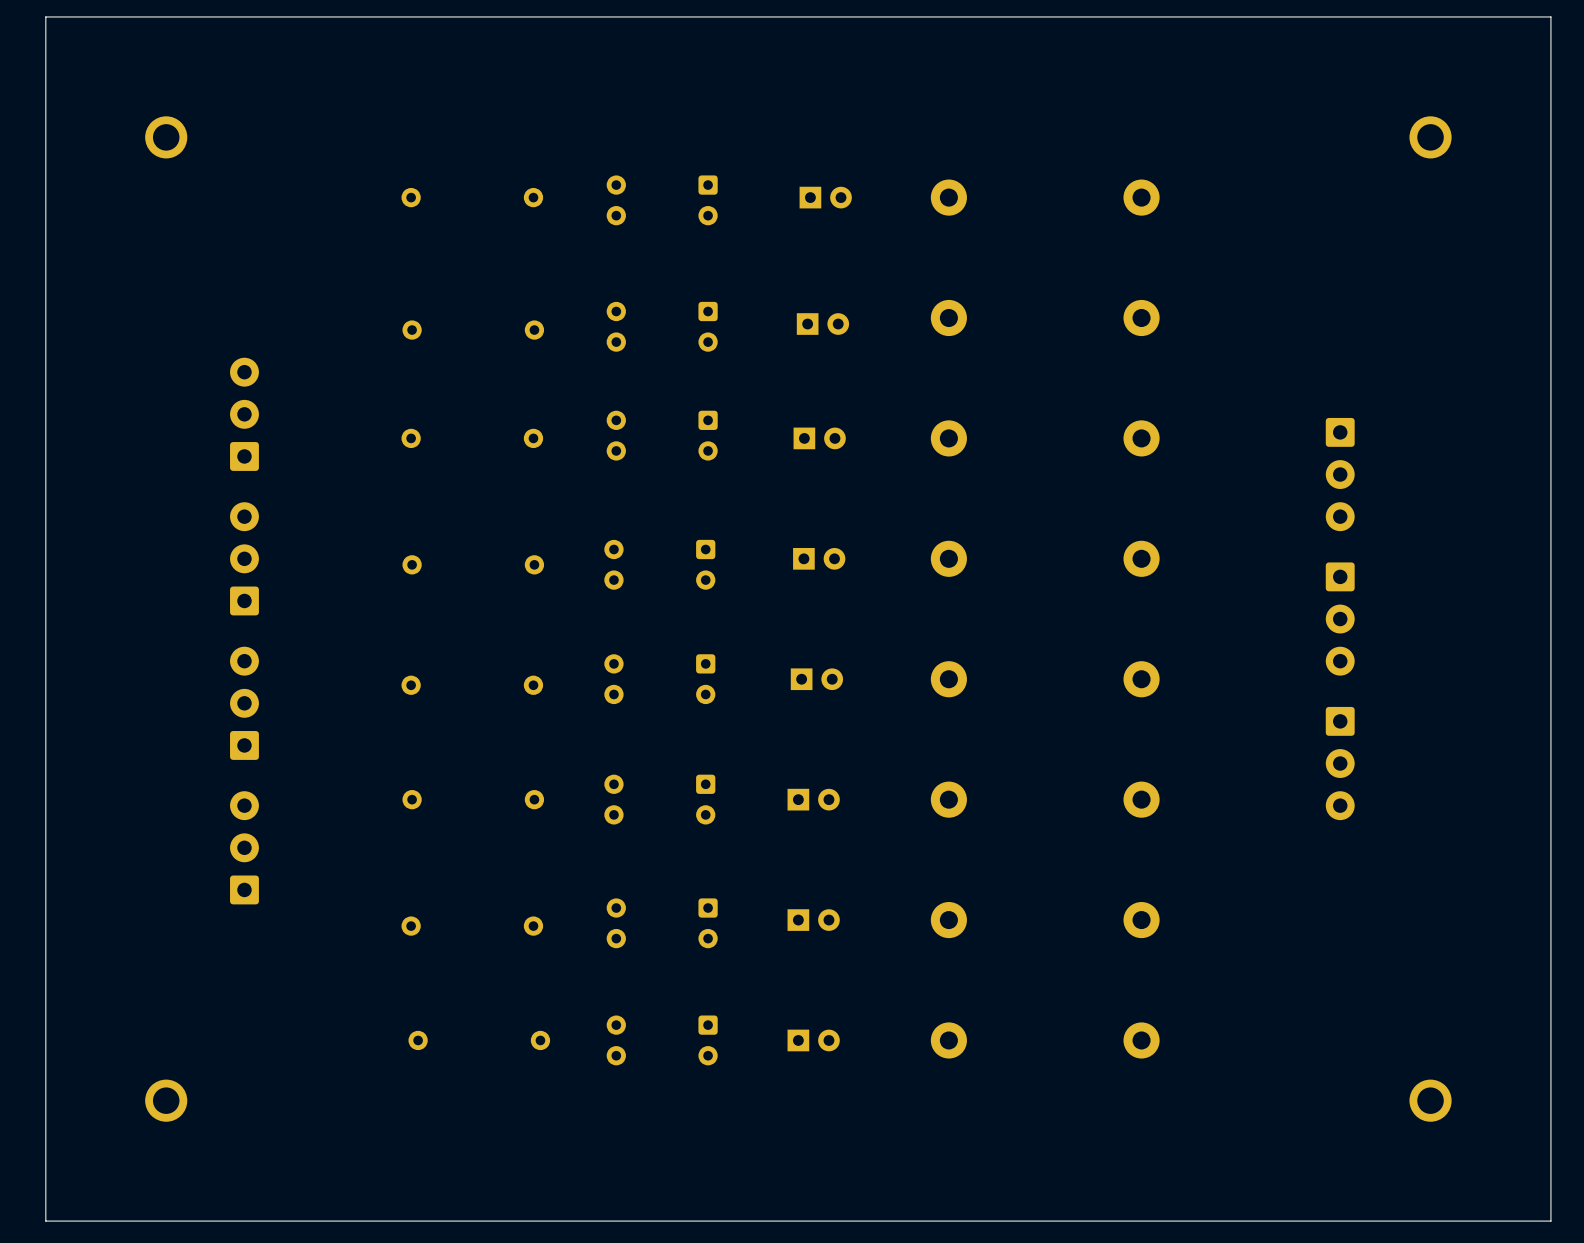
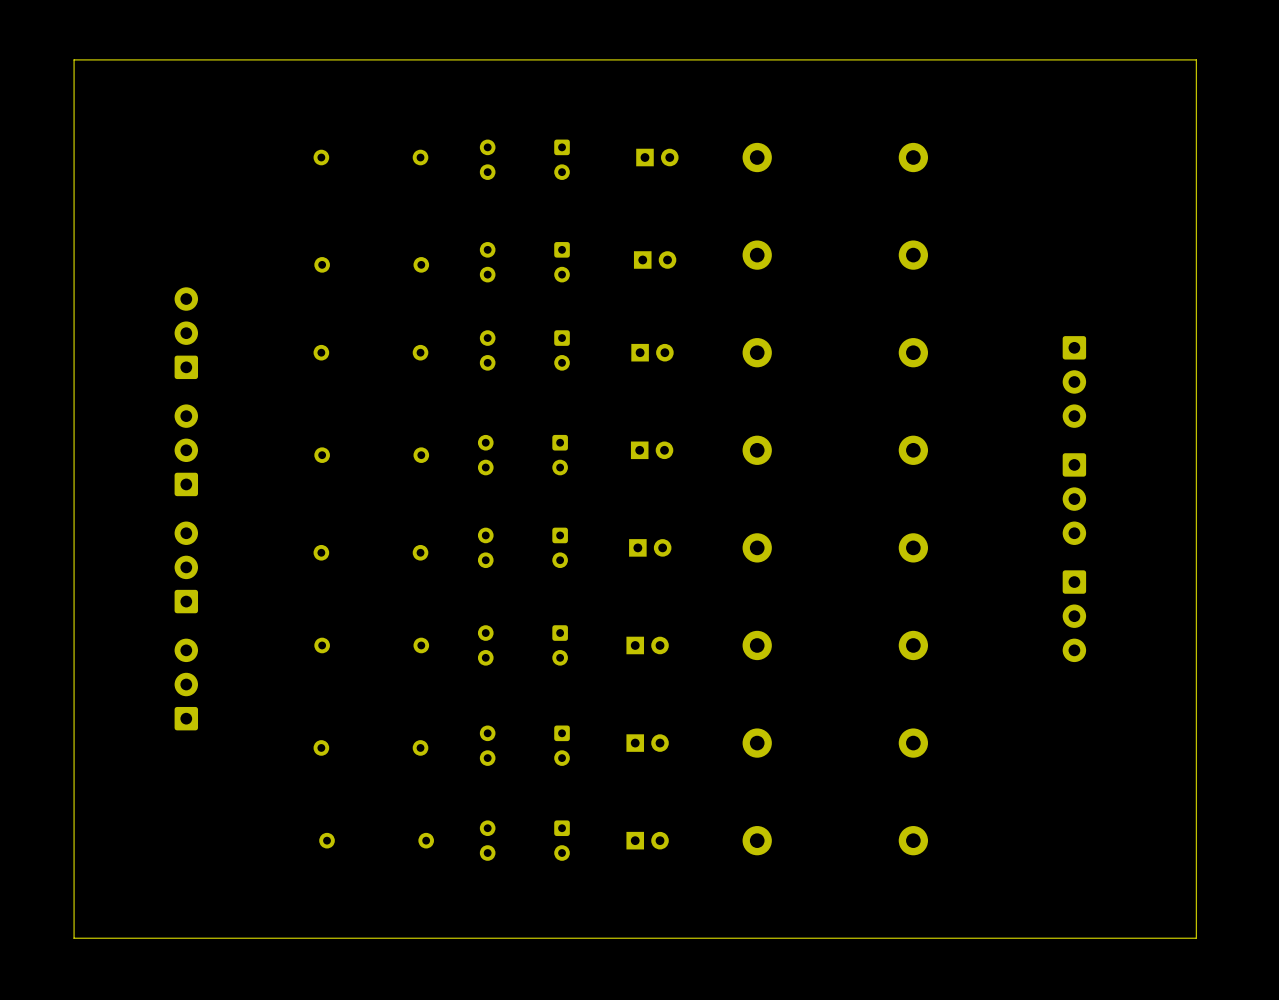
board edge: (1550, 16) (45, 16) (45, 1221) (1550, 1221) (1550, 16) -> (1196, 59) (1196, 938) (74, 938) (74, 59) (1196, 59)
part: (166, 137) -> none
part: (1430, 137) -> none
part: (166, 1100) -> none
part: (1430, 1100) -> none

